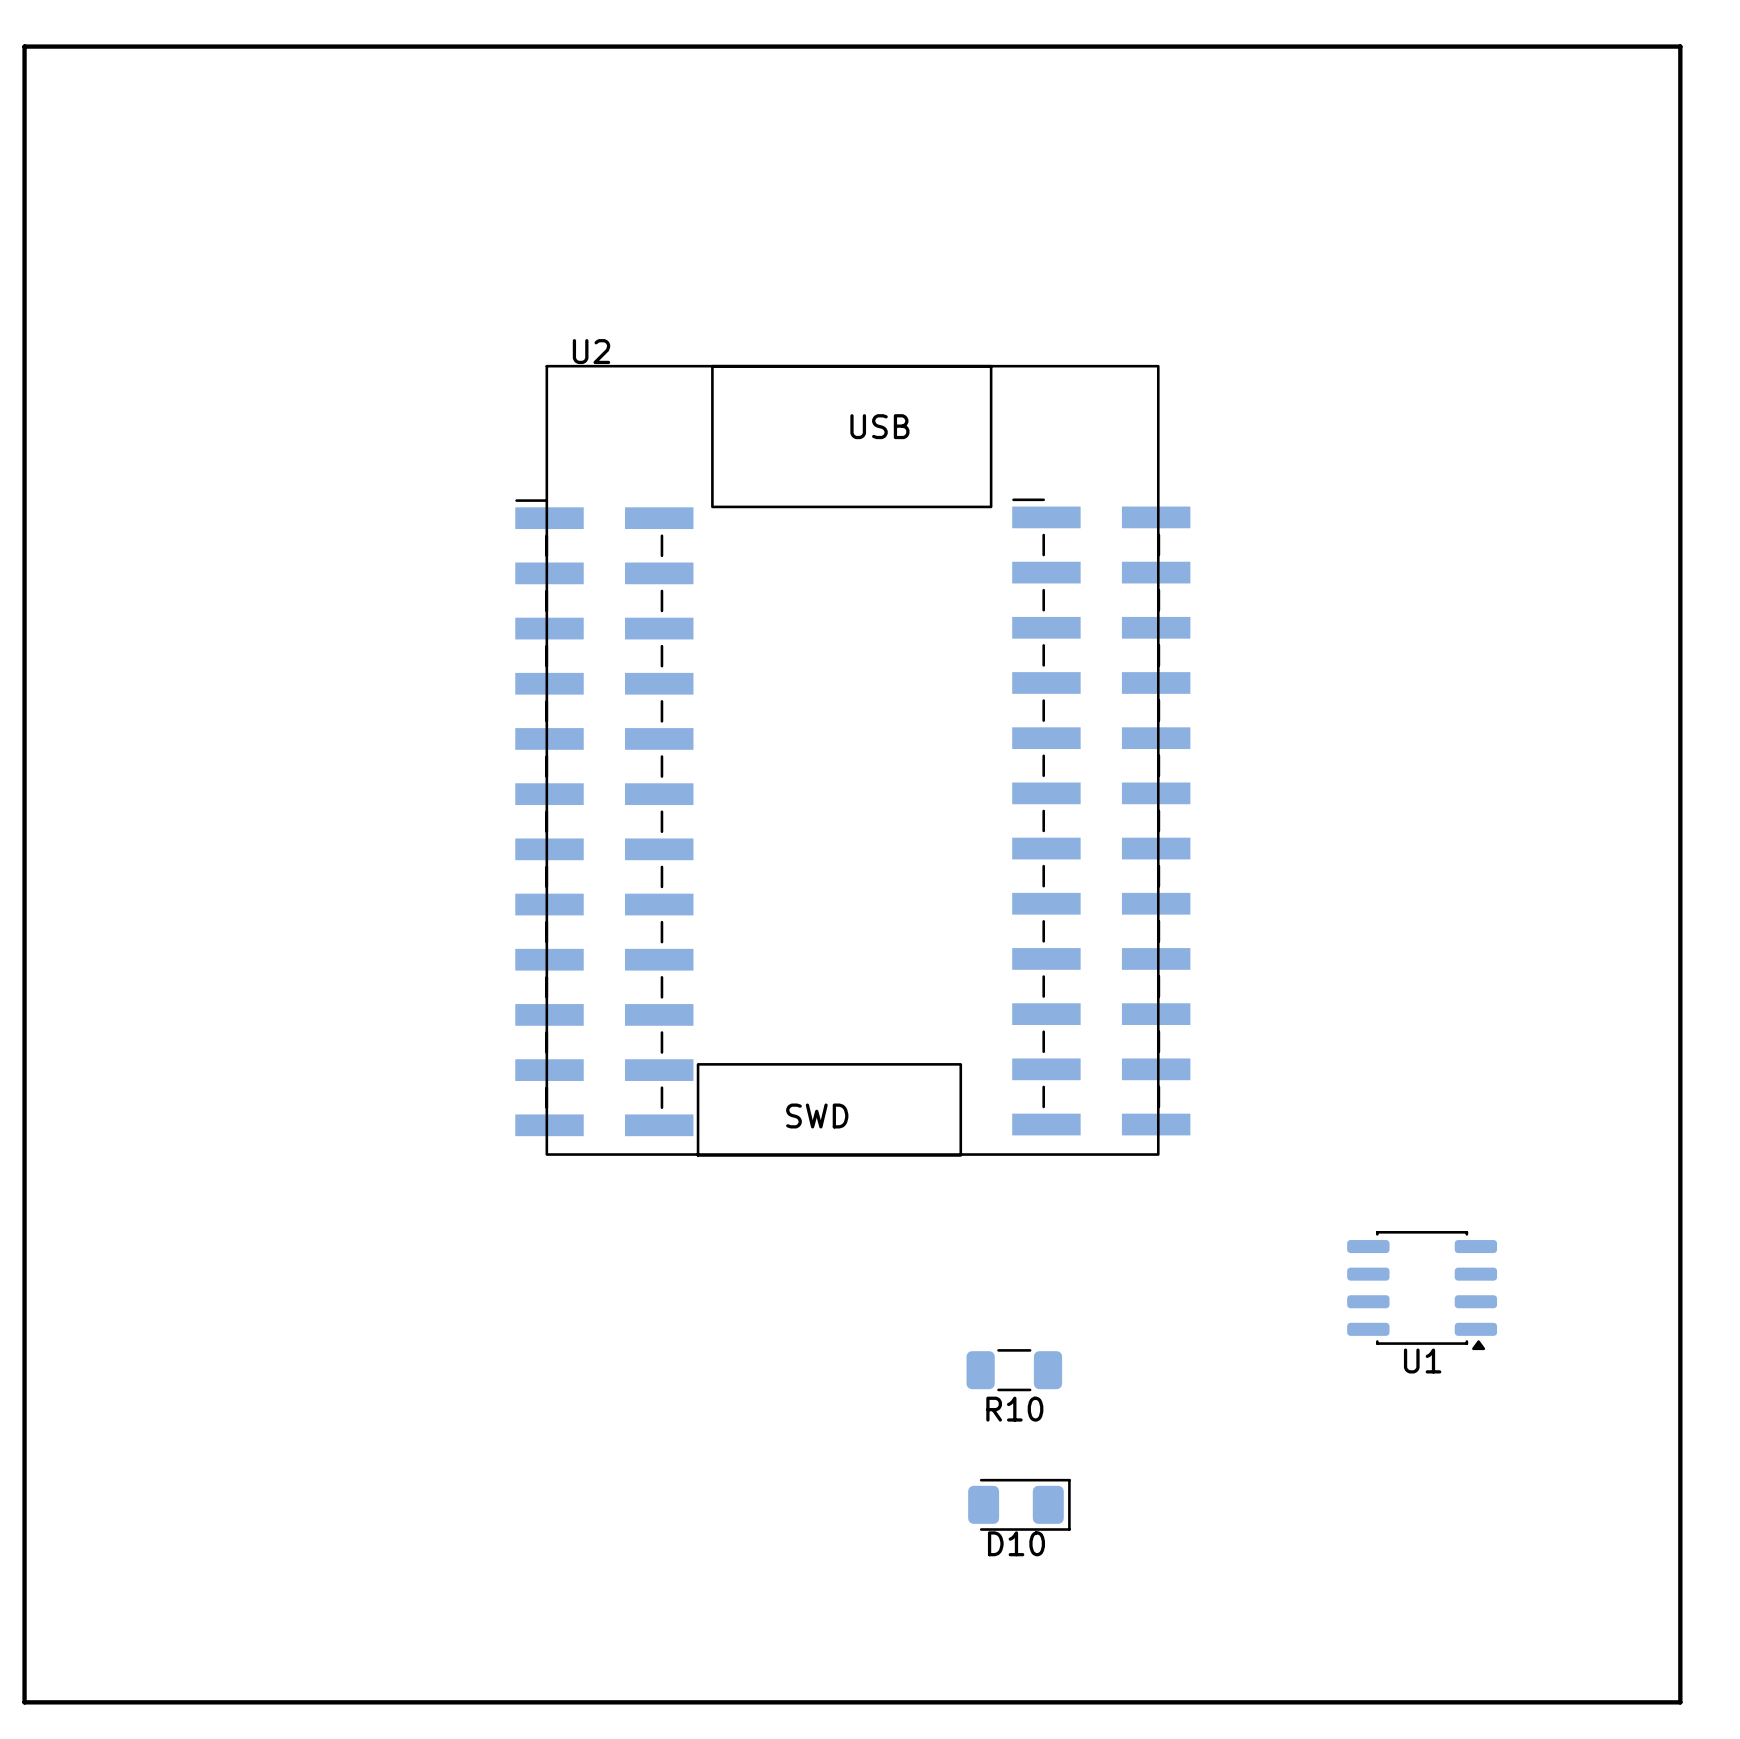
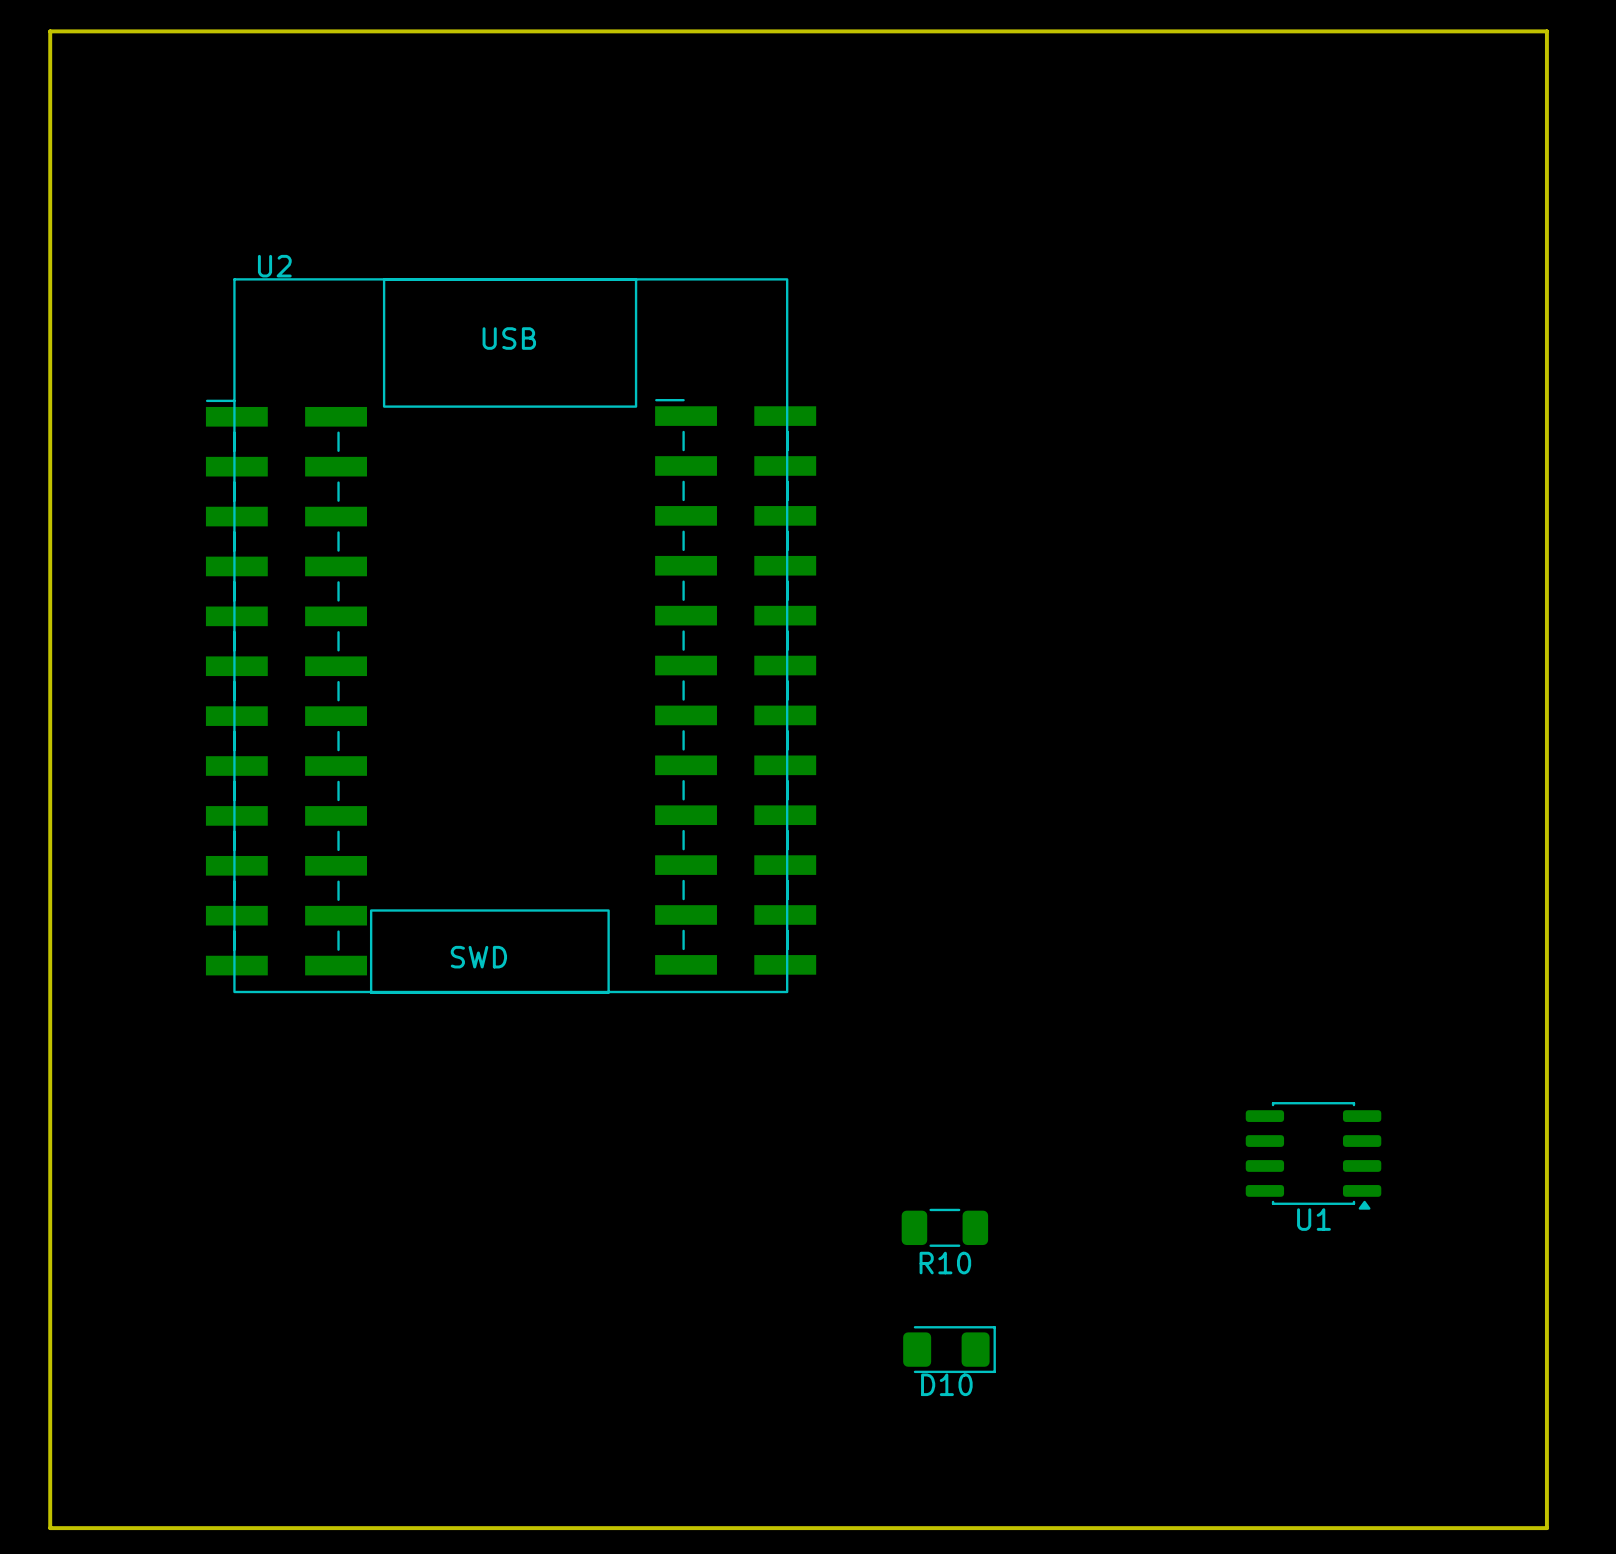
U2 text position: USB (879, 426) -> USB (509, 338)
U2 position: (852, 760) -> (511, 636)

